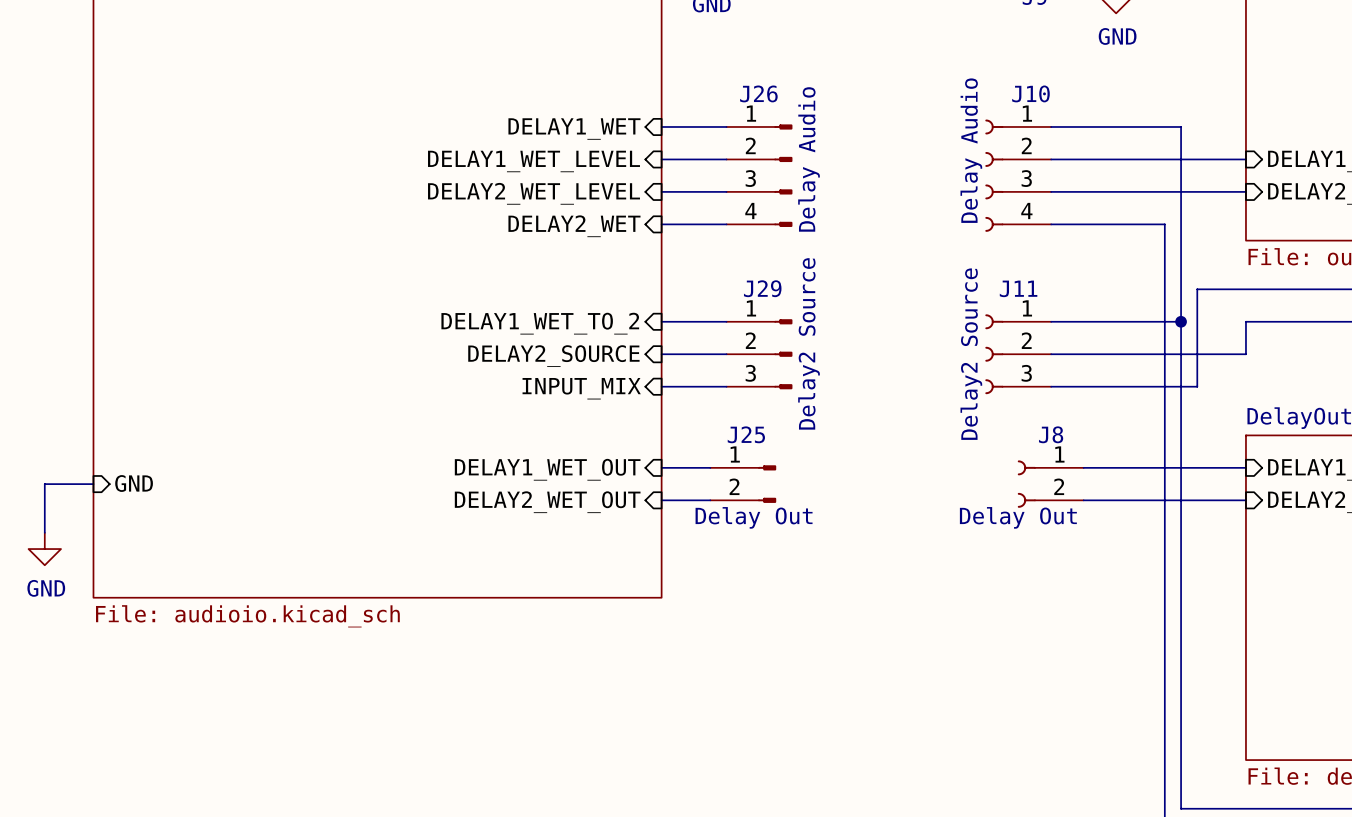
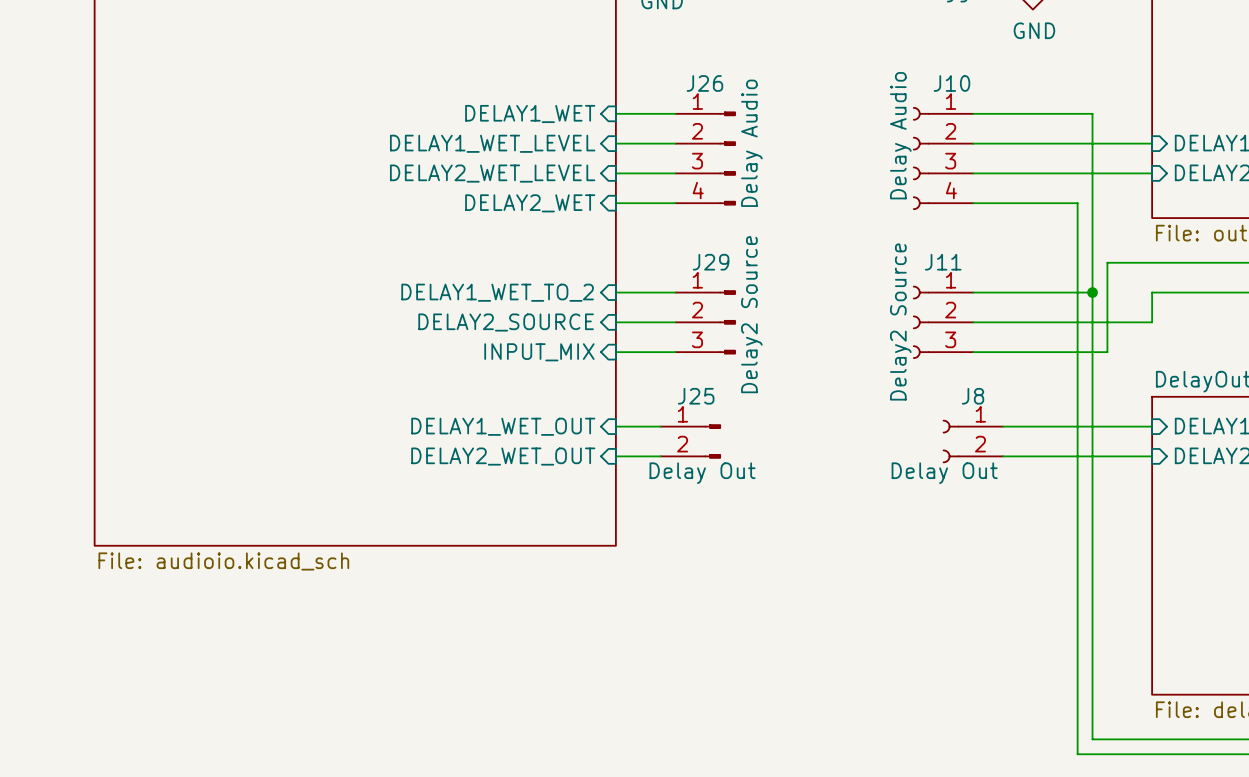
sheet pin: GND (134, 483) -> none
wire: (93, 484) (44, 484) (44, 532) -> none
power symbol: GND (44, 549) -> none

